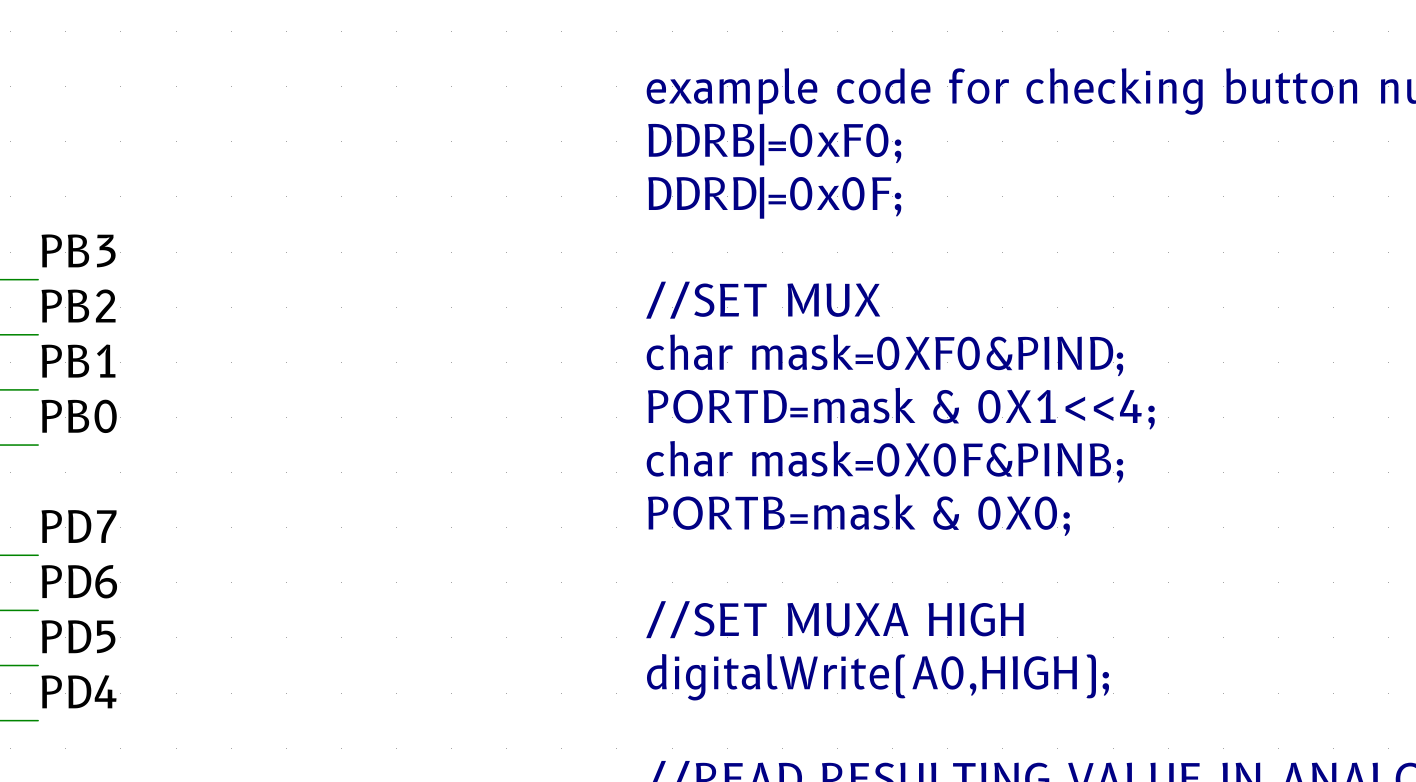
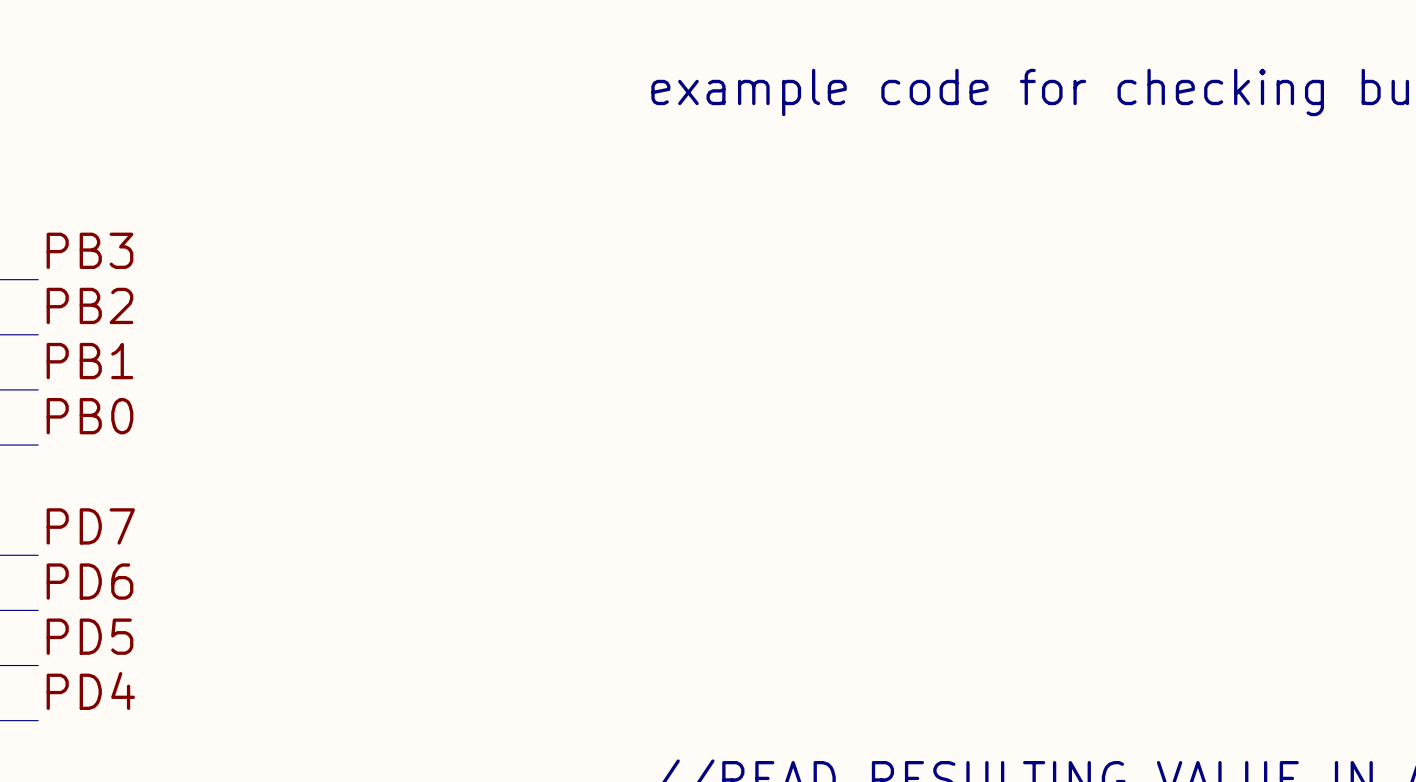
text: DDRB|=0xF0; (774, 144) -> none
text: DDRD|=0x0F; (774, 197) -> none
text: //SET MUX (763, 300) -> none
text: char mask=0XF0&PIND; (884, 355) -> none
text: PORTD=mask & 0X1<<4; (901, 408) -> none
text: char mask=0X0F&PINB; (884, 461) -> none
text: PORTB=mask & 0X0; (858, 515) -> none
text: //SET MUXA HIGH (834, 619) -> none
text: digitalWrite(A0,HIGH); (877, 677) -> none

